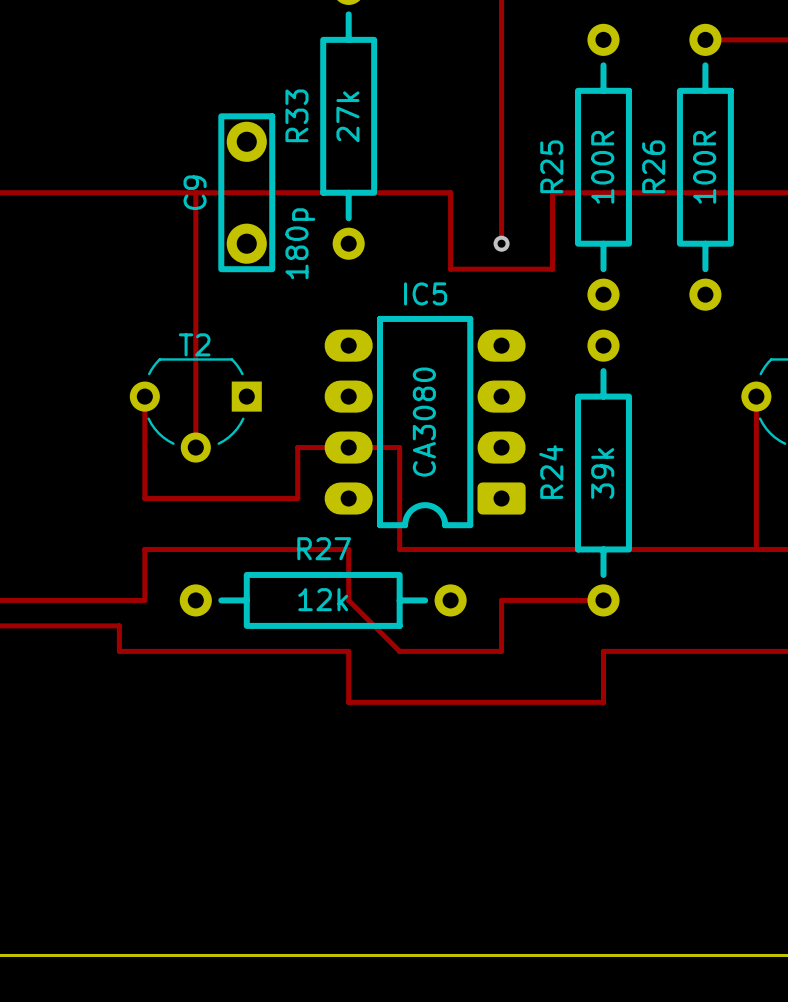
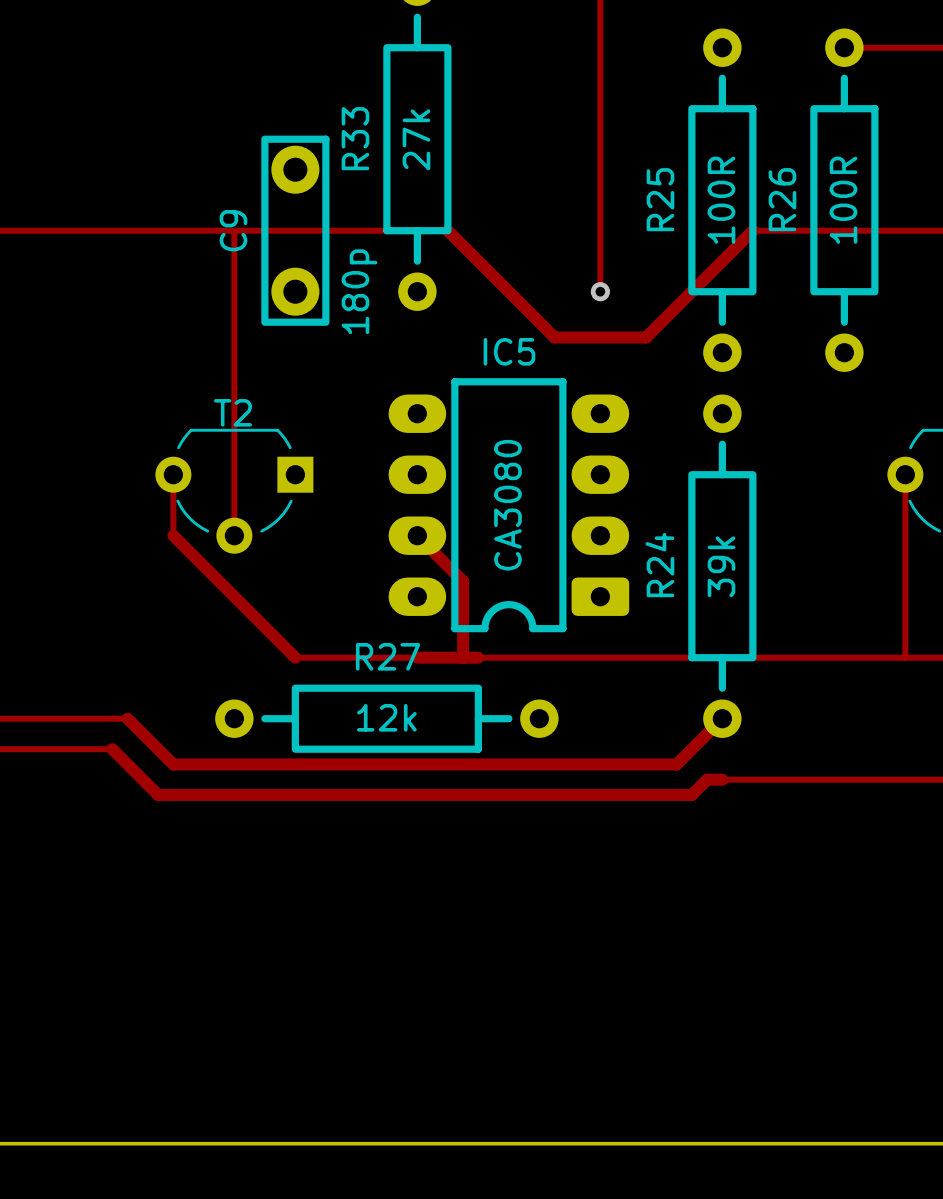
track: (374, 192) (450, 192) (450, 269) (552, 269) (552, 192) (628, 192) -> (447, 230) (554, 337) (646, 337) (752, 230)
track: (144, 447) (144, 498) (297, 498) (297, 447) (399, 447) (399, 549) -> (173, 535) (295, 657)
track: none -> (417, 535) (463, 581) (463, 657)
track: (246, 549) (144, 549) (144, 600) (106, 600) -> (722, 718) (676, 764) (173, 764) (127, 718)
track: (348, 549) (348, 600) (399, 651) (501, 651) (501, 600) (603, 600) -> (417, 657) (478, 657)
track: (93, 625) (119, 625) (119, 651) (348, 651) (348, 702) (603, 702) (603, 651) -> (112, 749) (158, 794) (691, 794) (707, 779) (722, 779)

